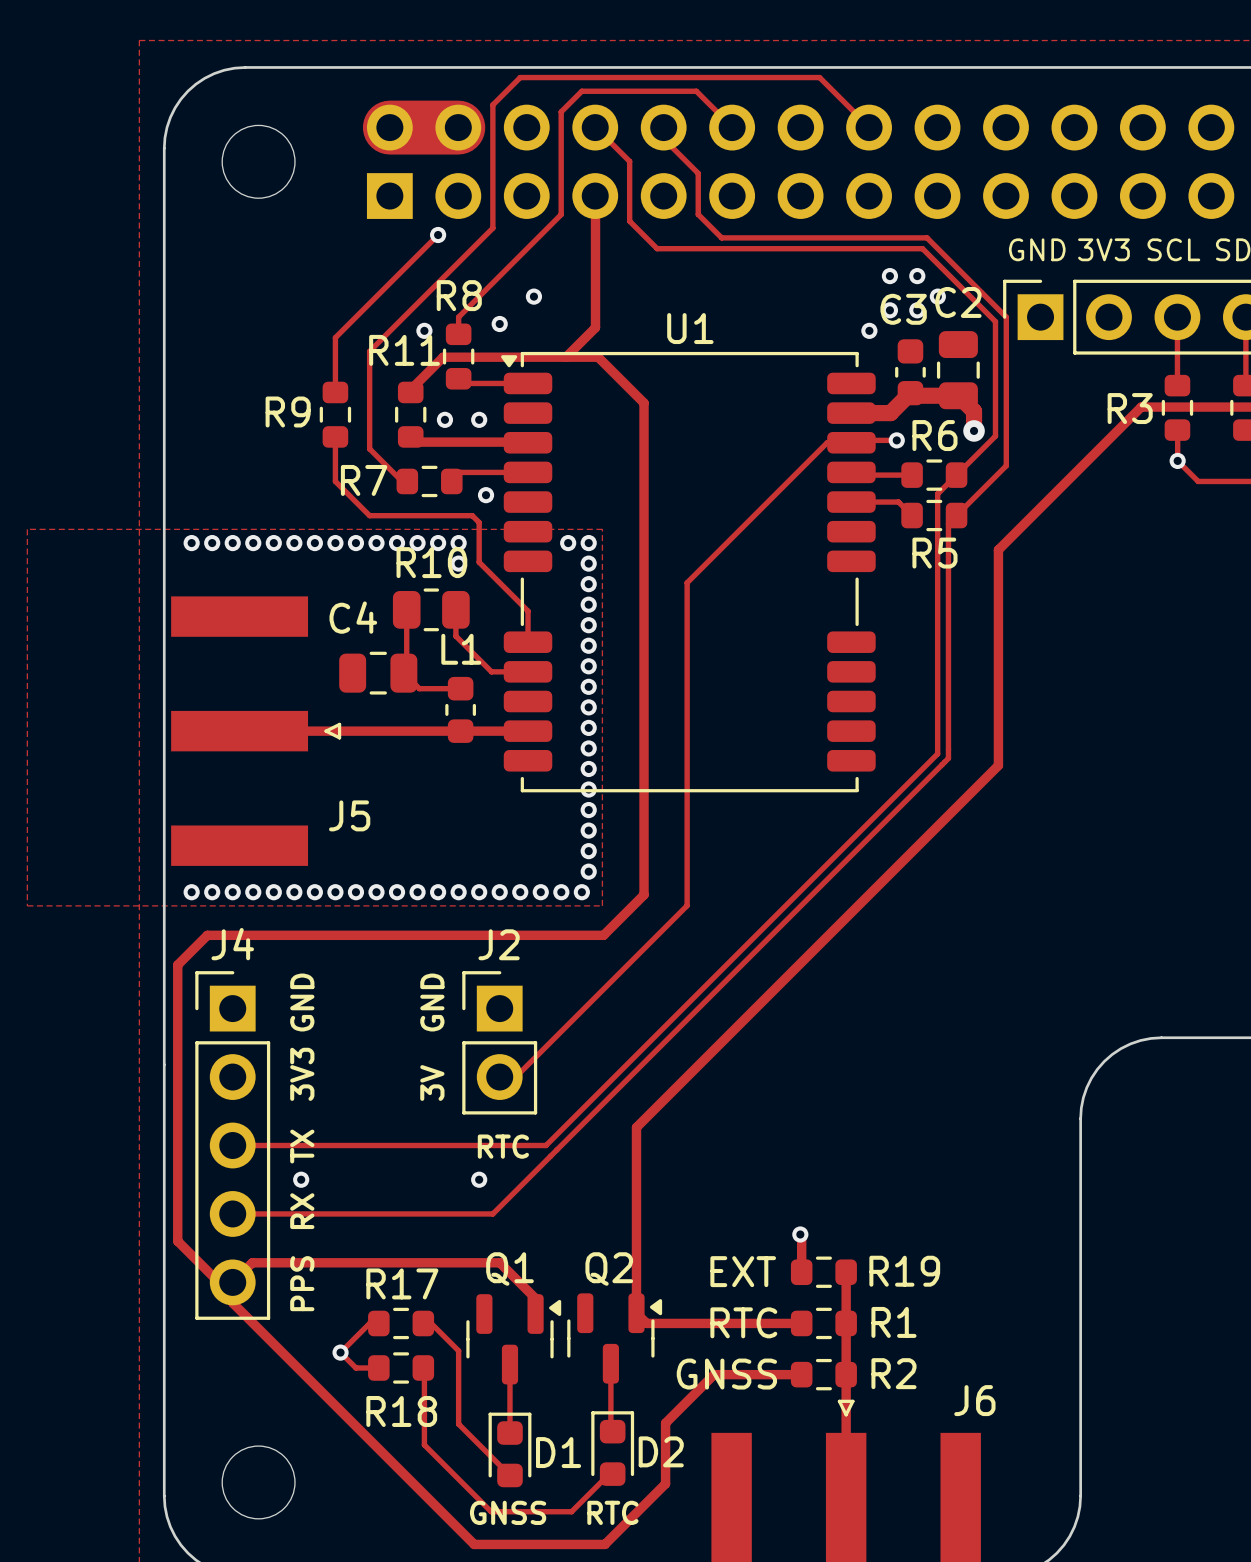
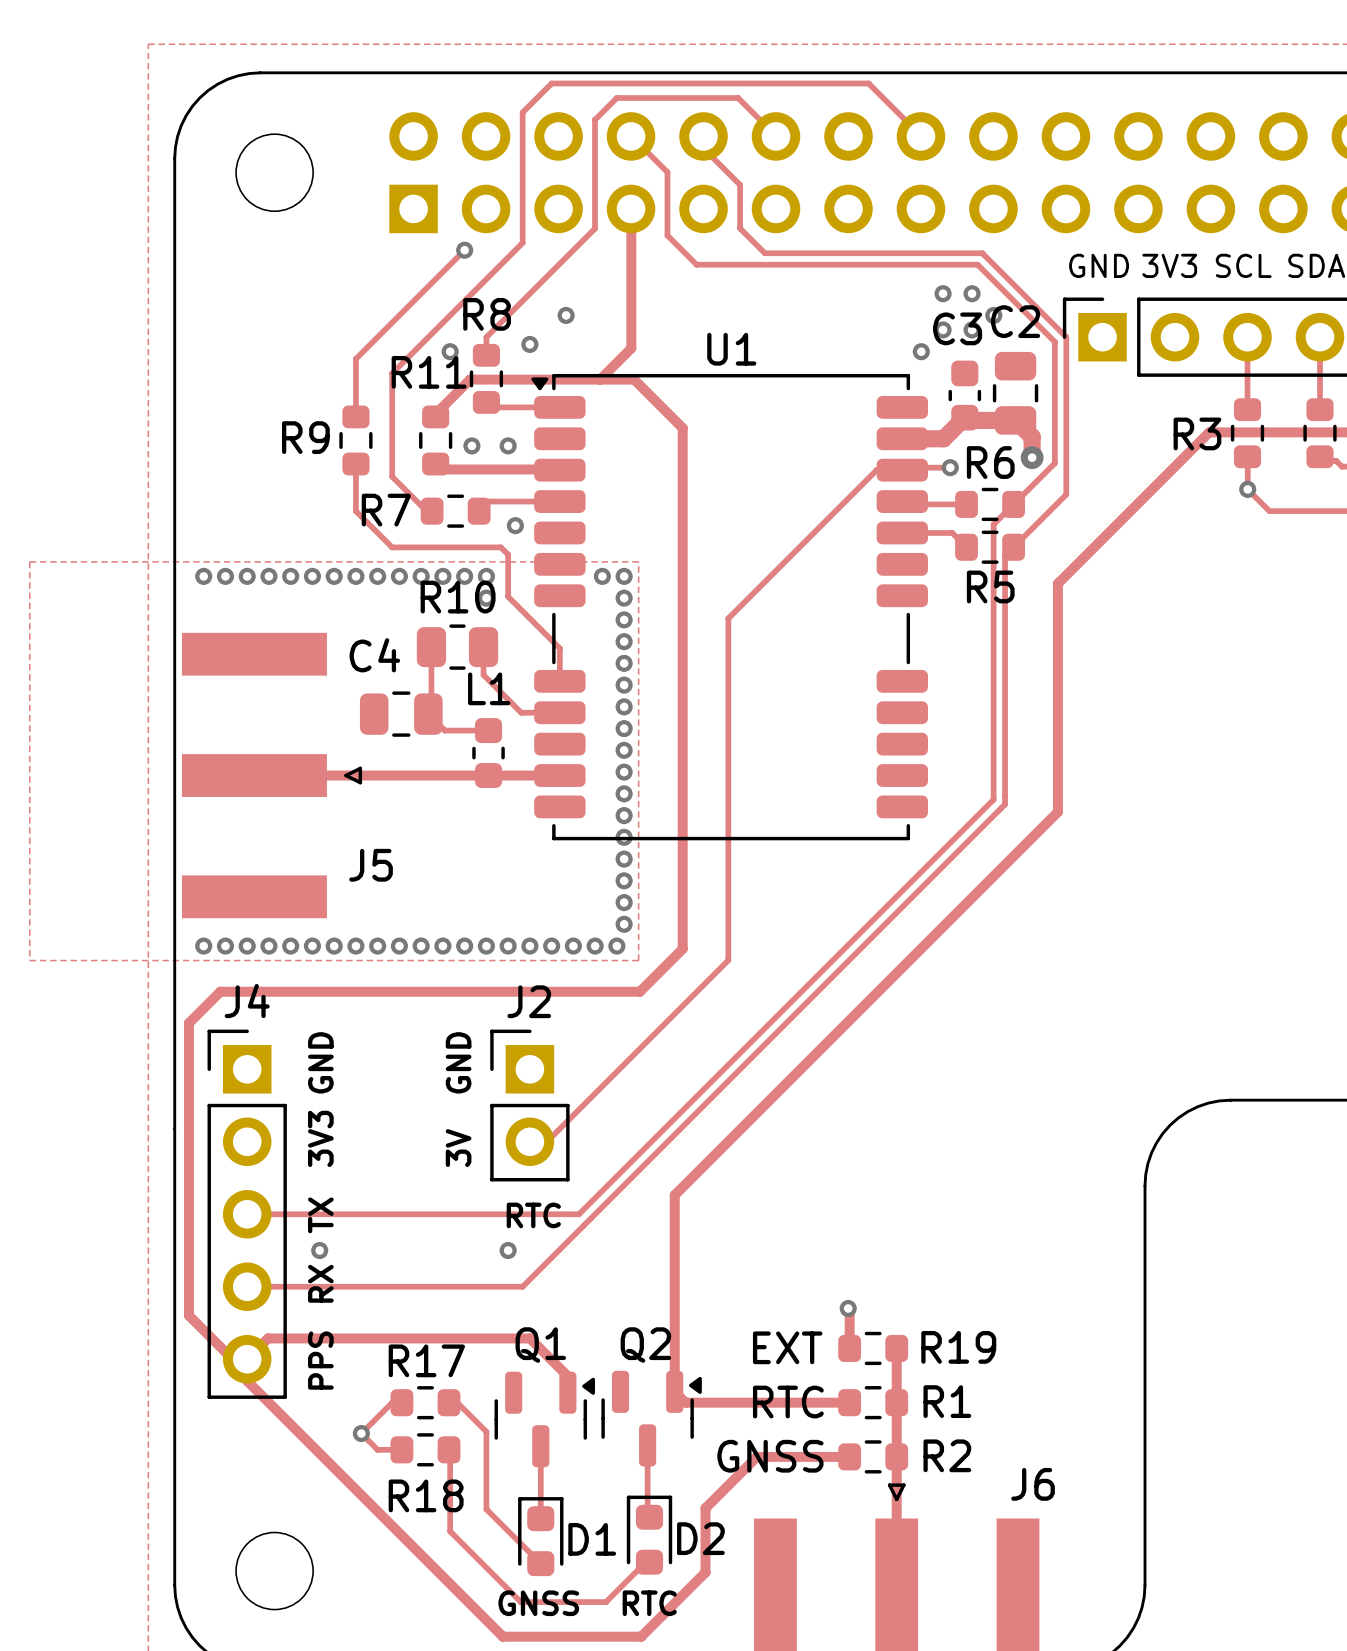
track: (389, 127) (458, 127) -> none

